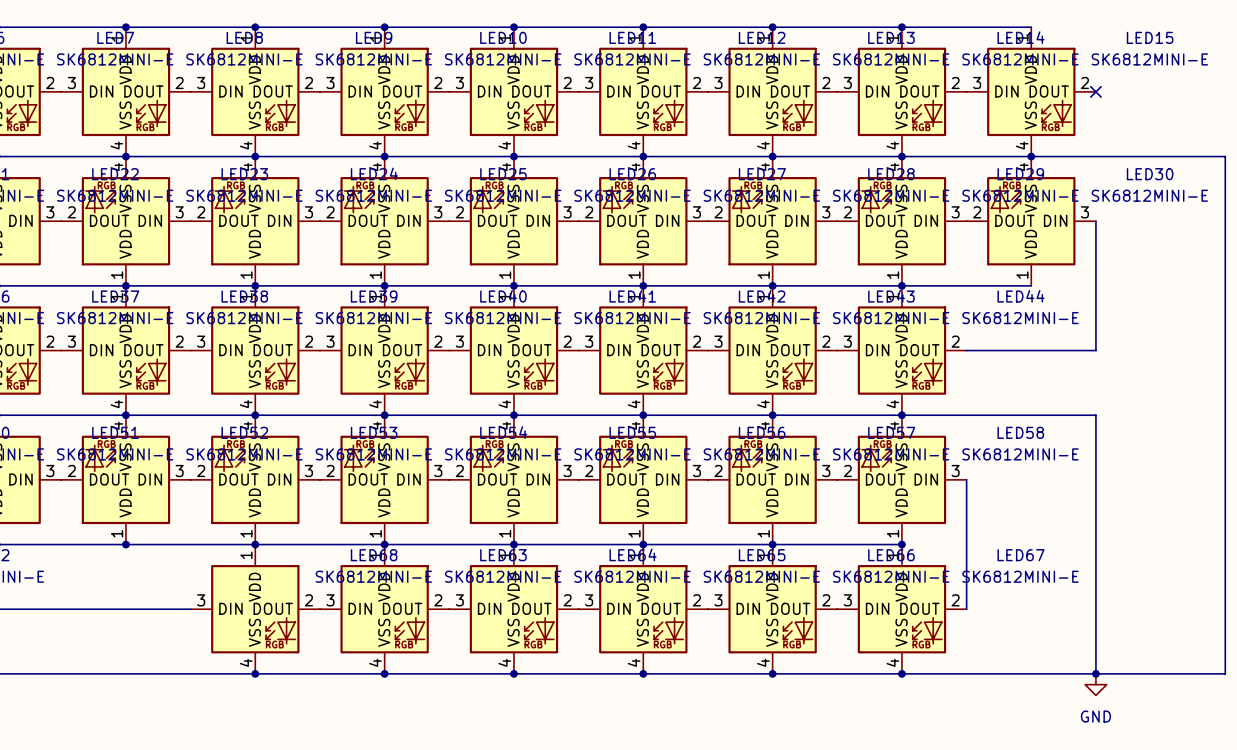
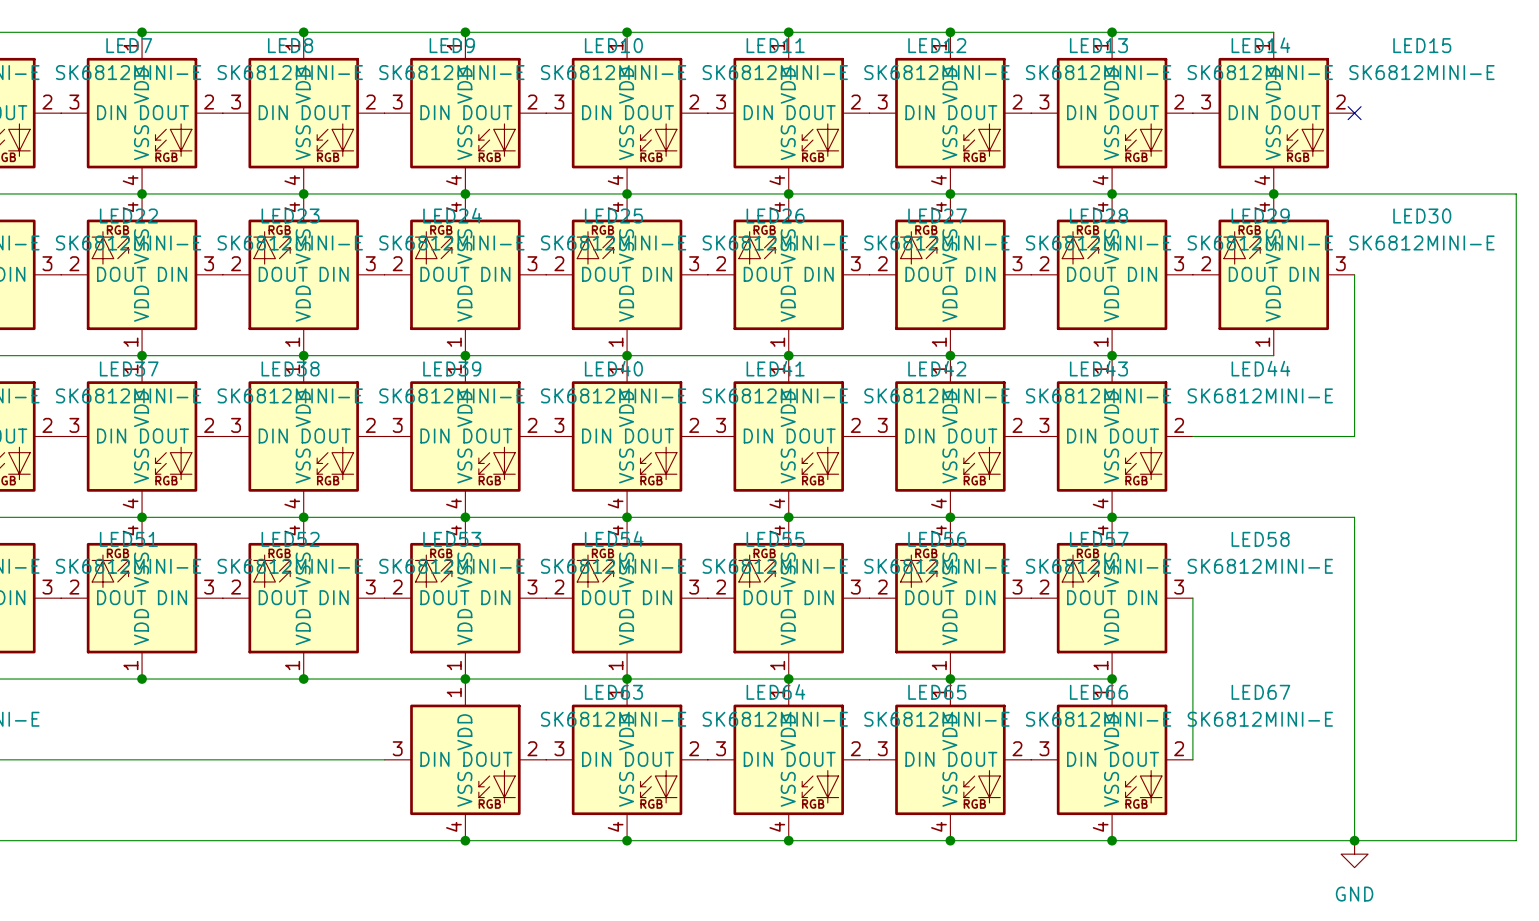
LED68: SK6812MINI-E (255, 609) -> none
junction: (255, 673) -> none

